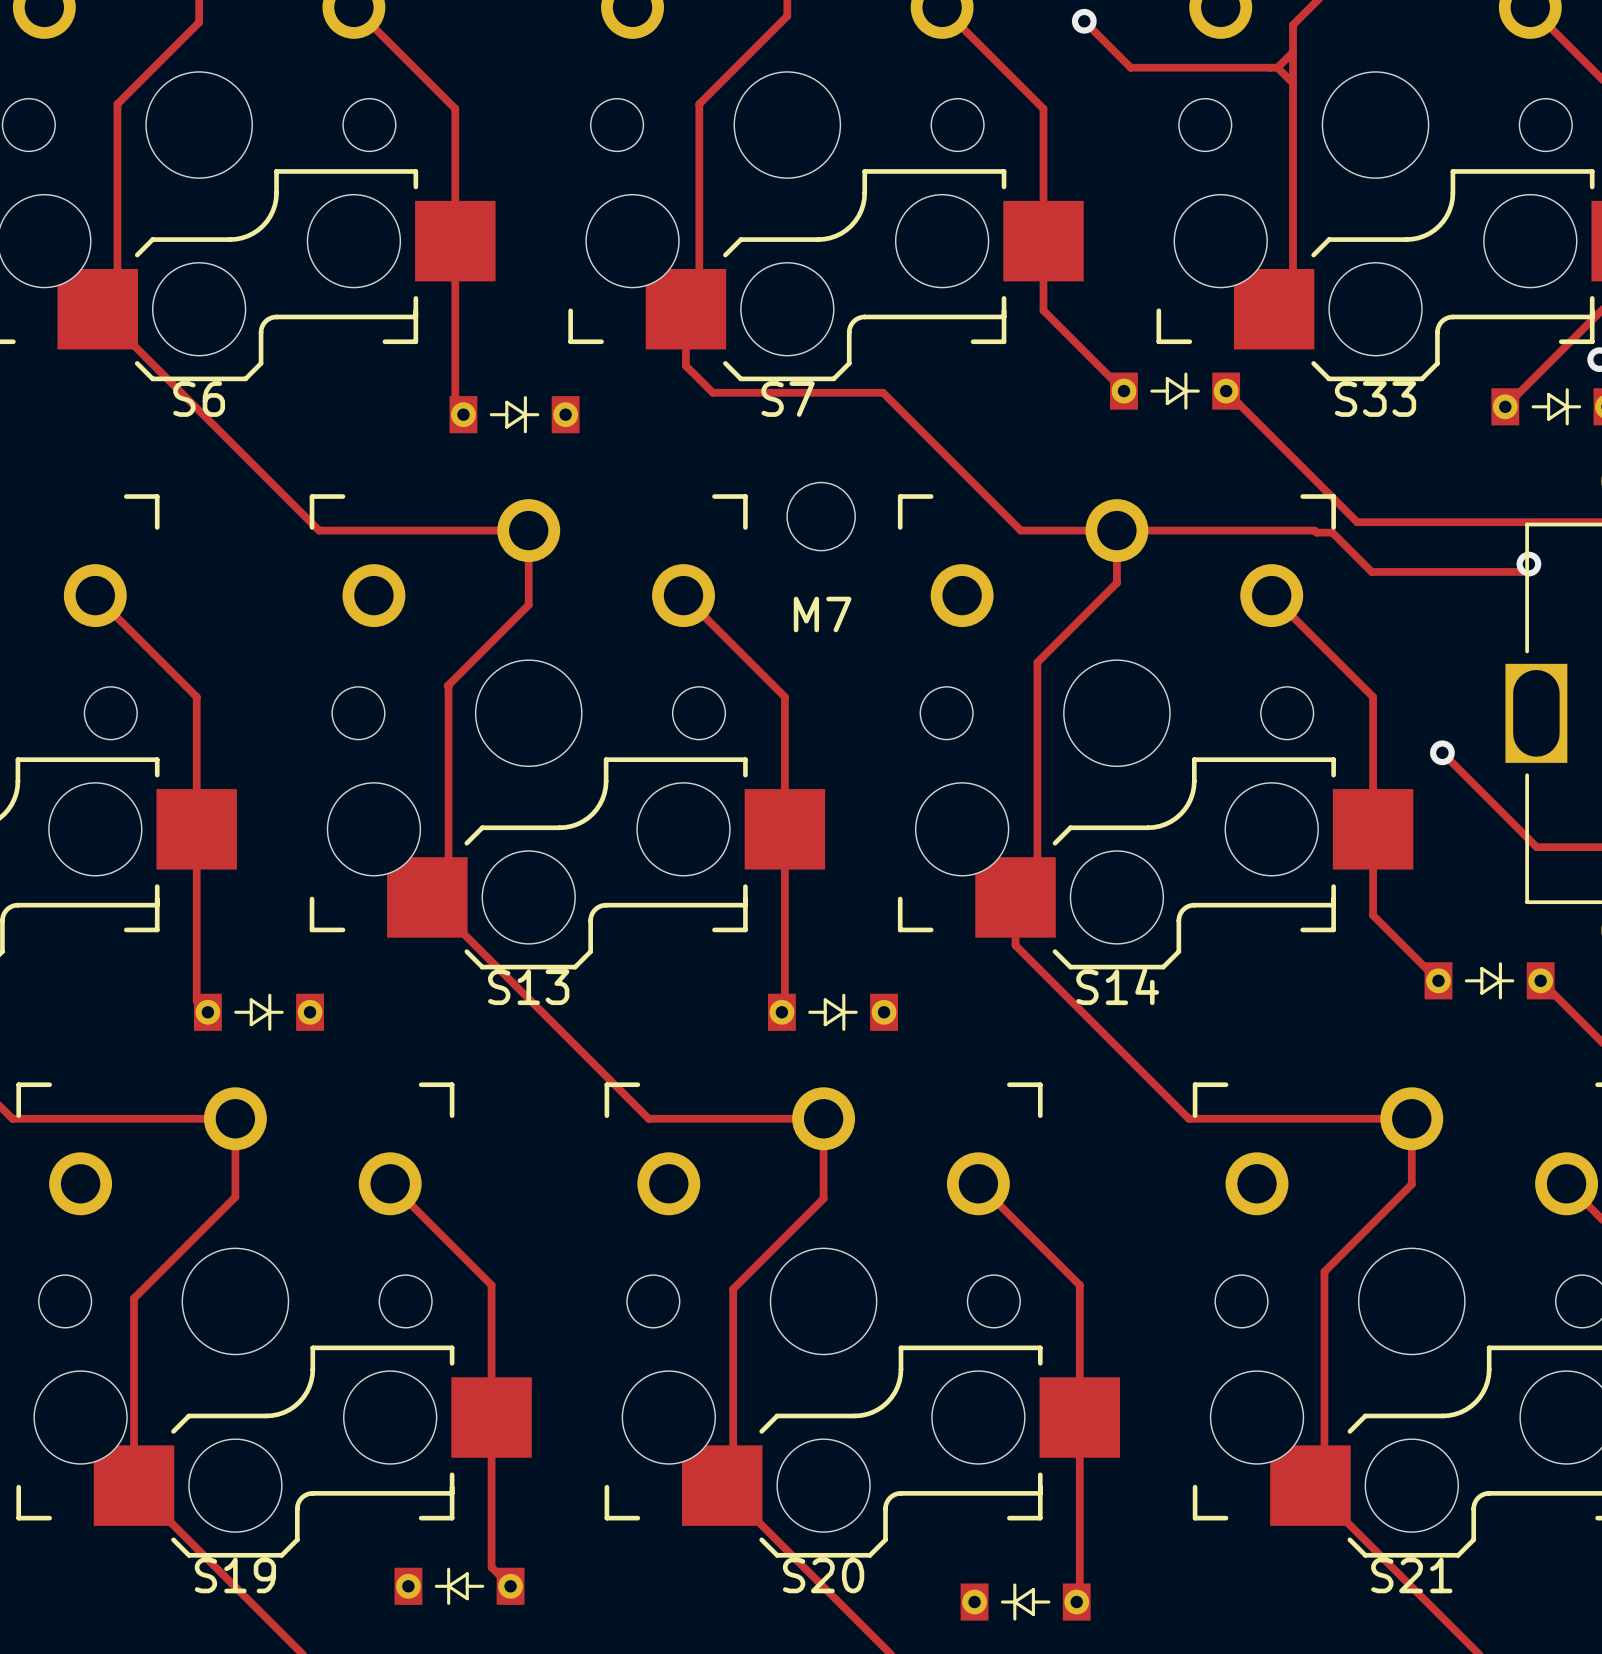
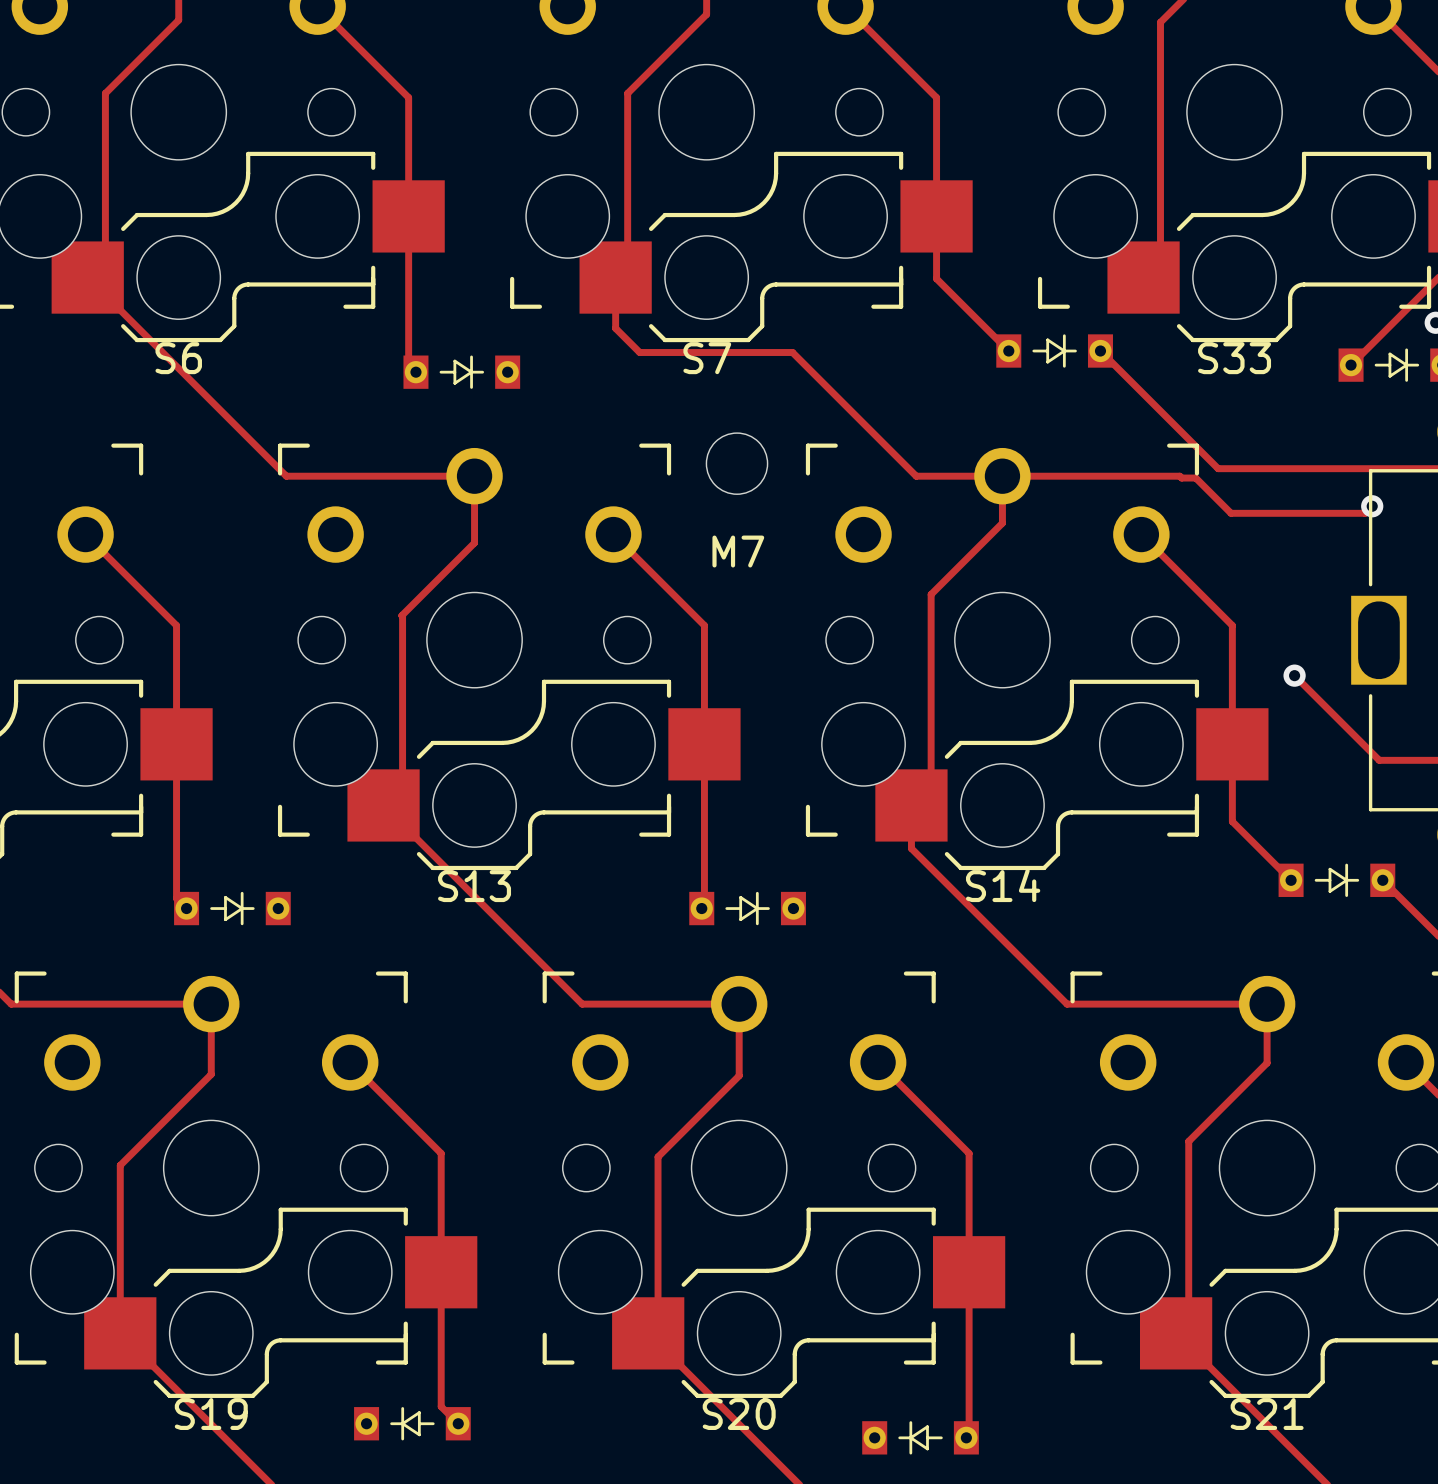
track: (1084, 21) (1130, 67) (1277, 67) -> none
via: (1084, 21) -> none
track: (1293, 52) (1277, 67) -> none
track: (1277, 67) (1293, 83) -> none

